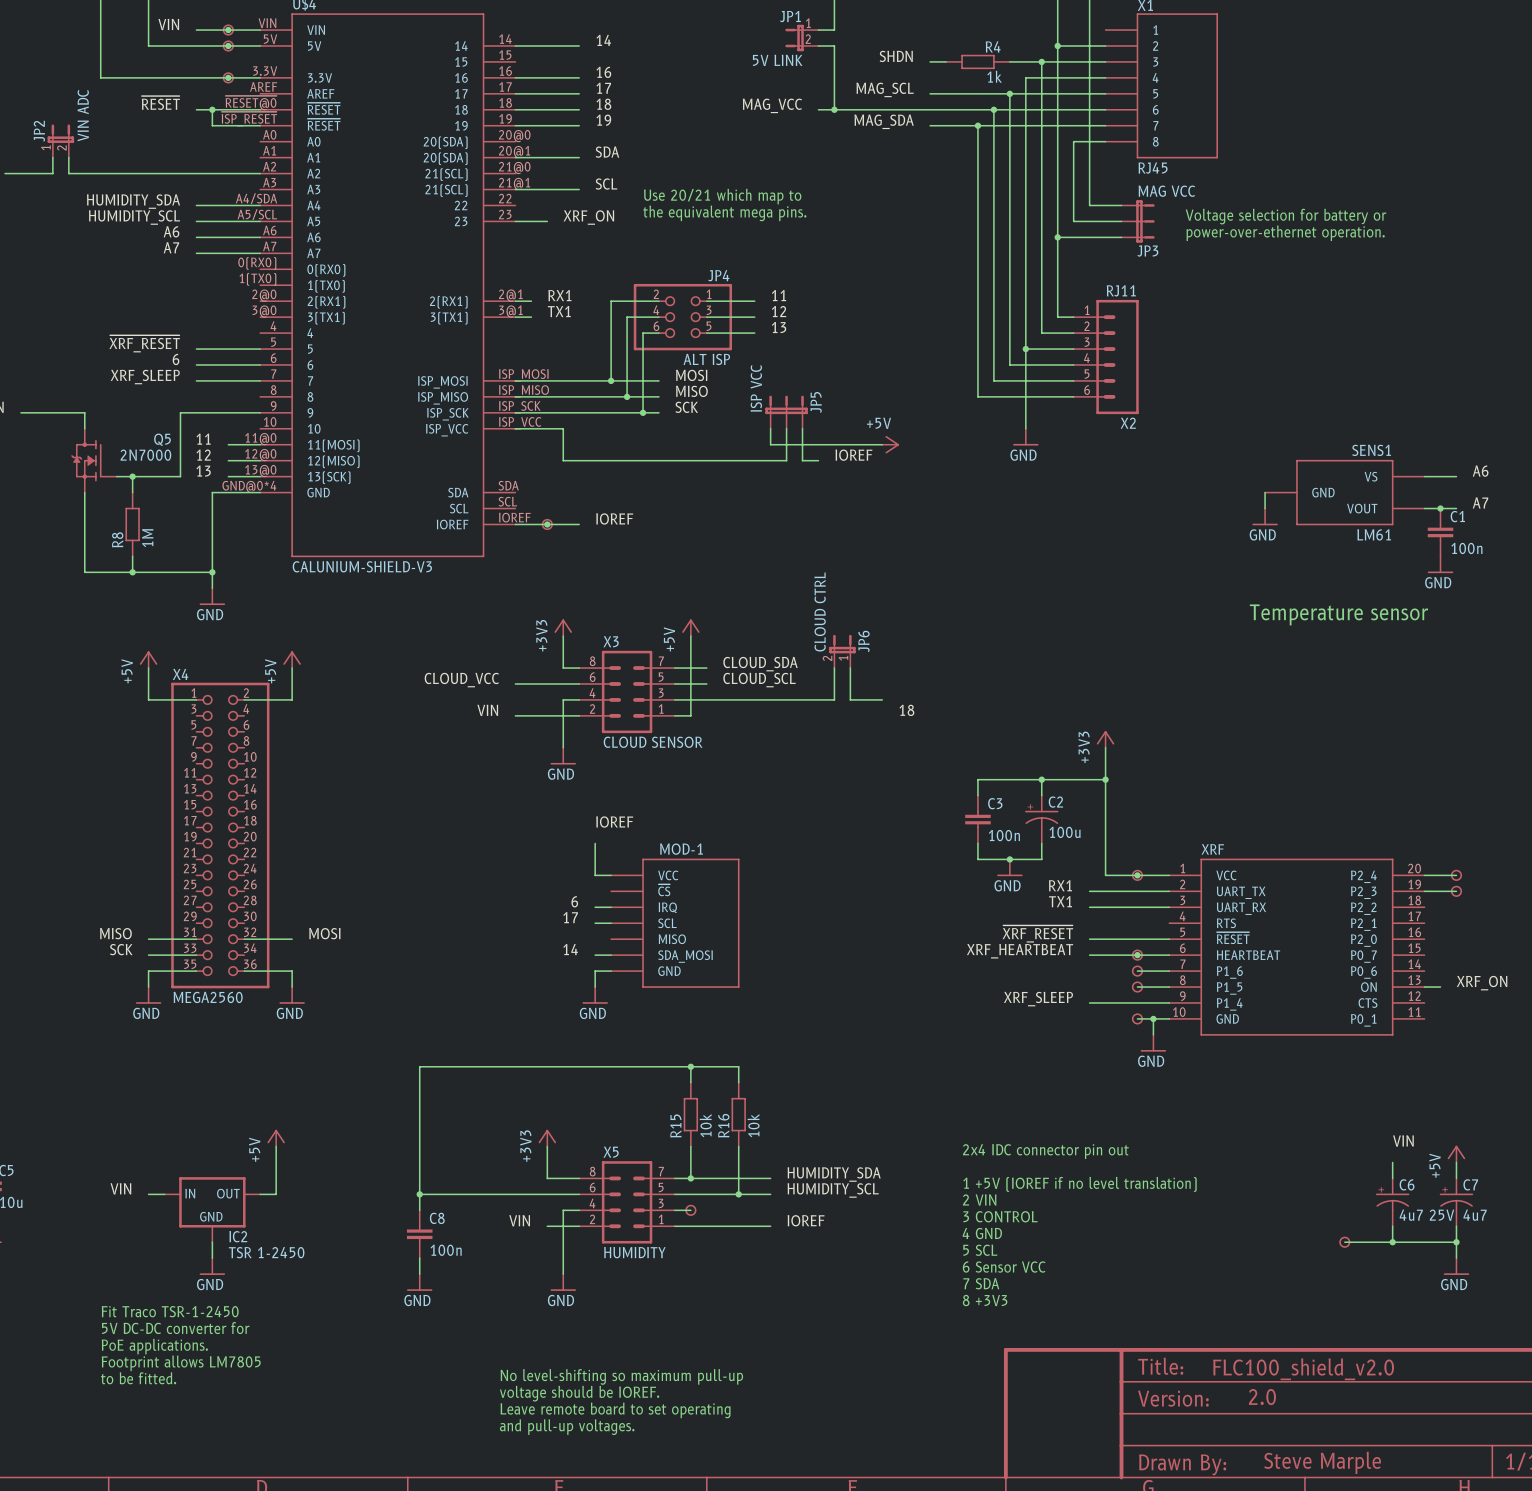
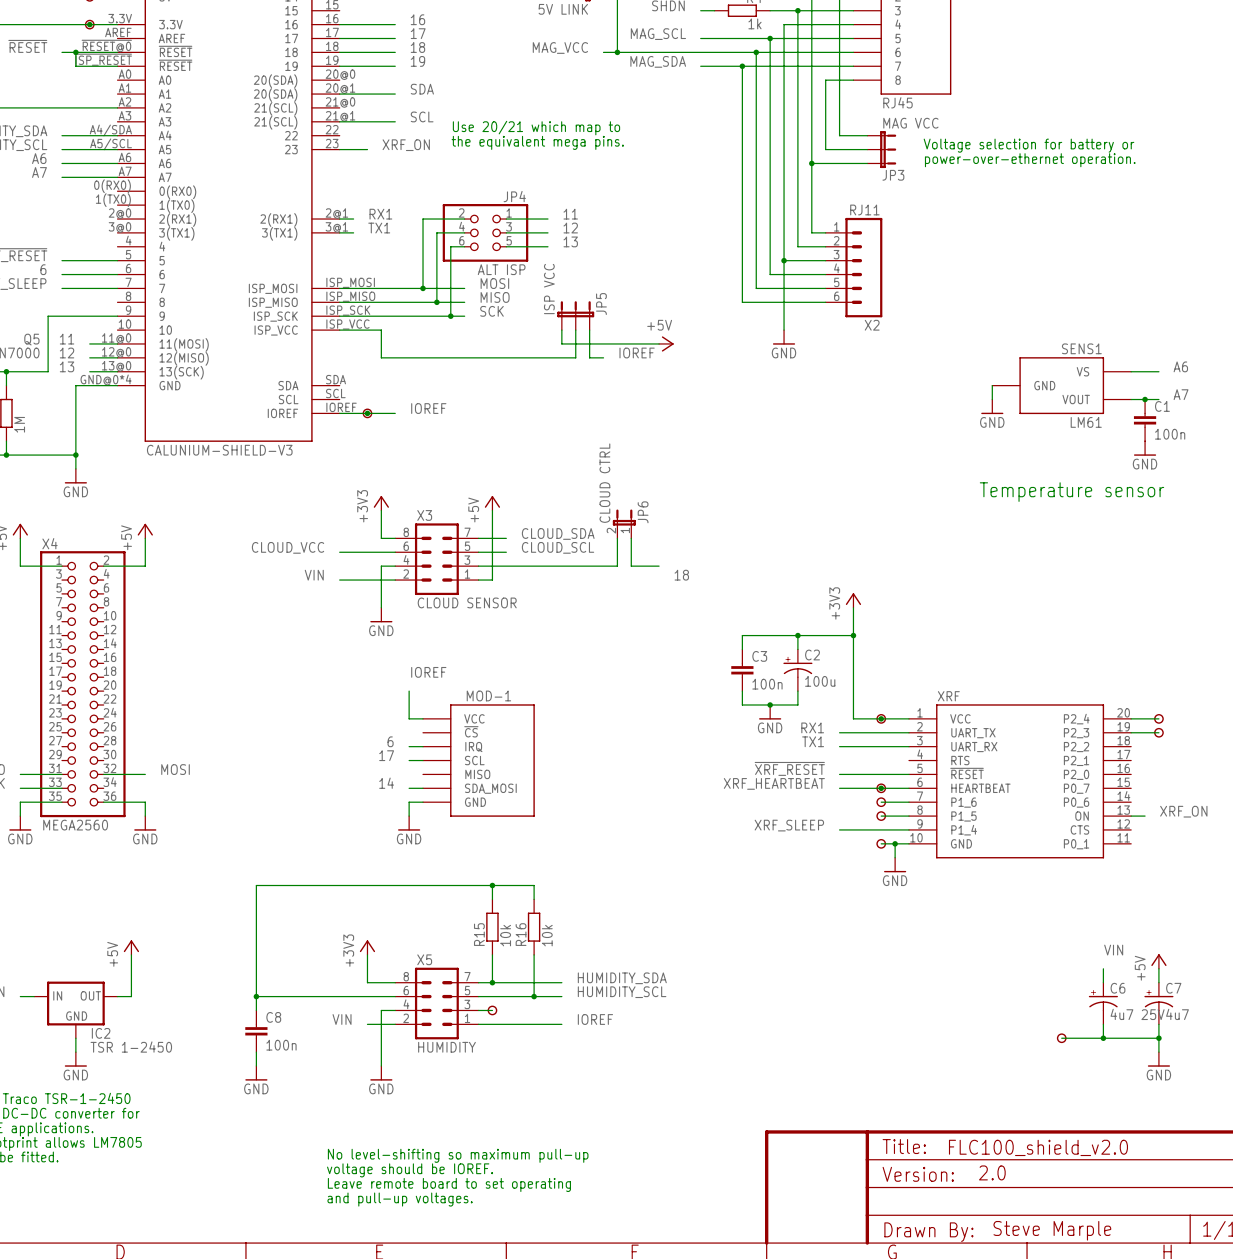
text: 2x4 IDC connector pin out (1045, 1151) -> none
text: 1 +5V (IOREF if no level translation) (1080, 1184) -> none
text: 2 VIN (979, 1200) -> none
text: 3 CONTROL (1000, 1216) -> none
text: 4 GND (982, 1233) -> none
text: 5 SCL (980, 1250) -> none
text: 6 Sensor VCC (1004, 1267) -> none
text: 7 SDA (981, 1283) -> none
text: 8 +3V3 (985, 1300) -> none

